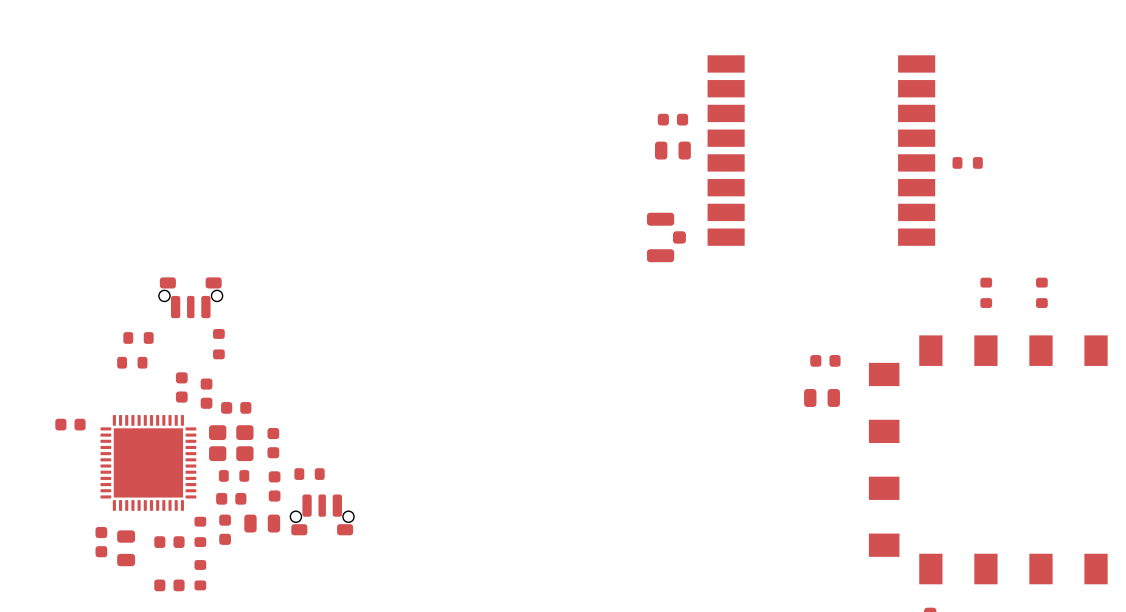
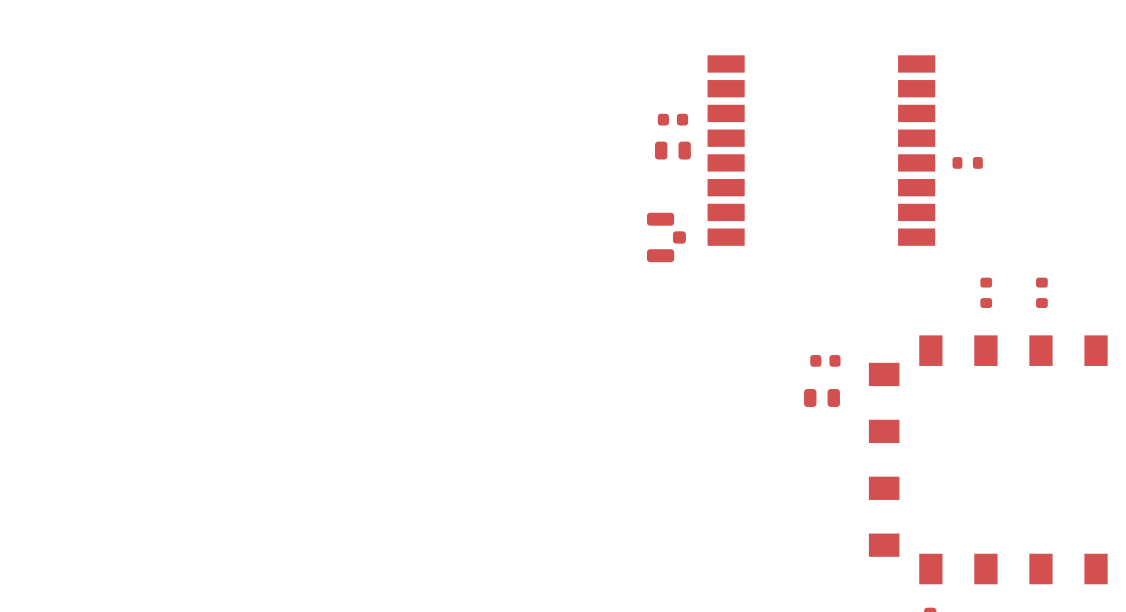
part: (190, 297) -> none
part: (138, 337) -> none
part: (218, 344) -> none
part: (132, 362) -> none
part: (181, 387) -> none
part: (206, 393) -> none
part: (236, 407) -> none
part: (70, 424) -> none
part: (231, 443) -> none
part: (273, 443) -> none
part: (148, 462) -> none
part: (309, 474) -> none
part: (234, 475) -> none
part: (274, 486) -> none
part: (231, 498) -> none
part: (322, 514) -> none
part: (262, 523) -> none
part: (225, 529) -> none
part: (200, 531) -> none
part: (101, 542) -> none
part: (169, 542) -> none
part: (126, 548) -> none
part: (200, 575) -> none
part: (169, 585) -> none

